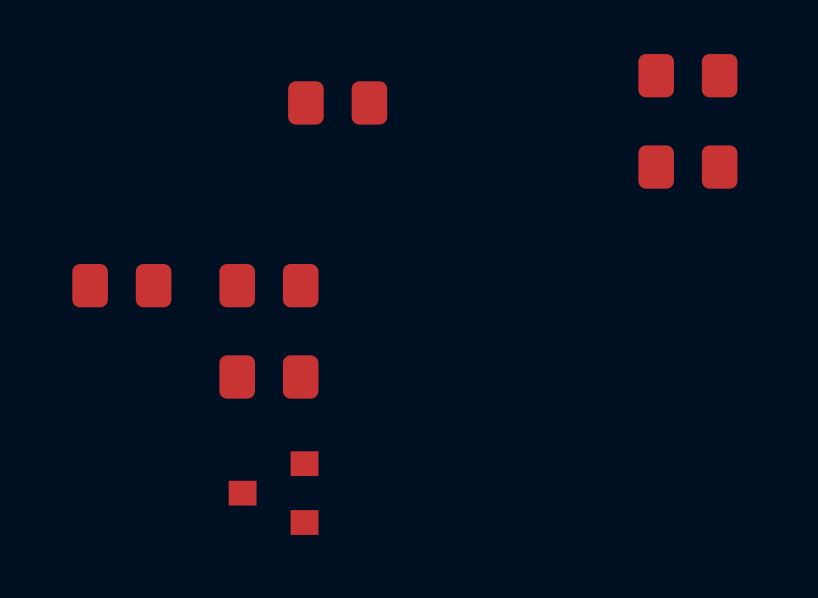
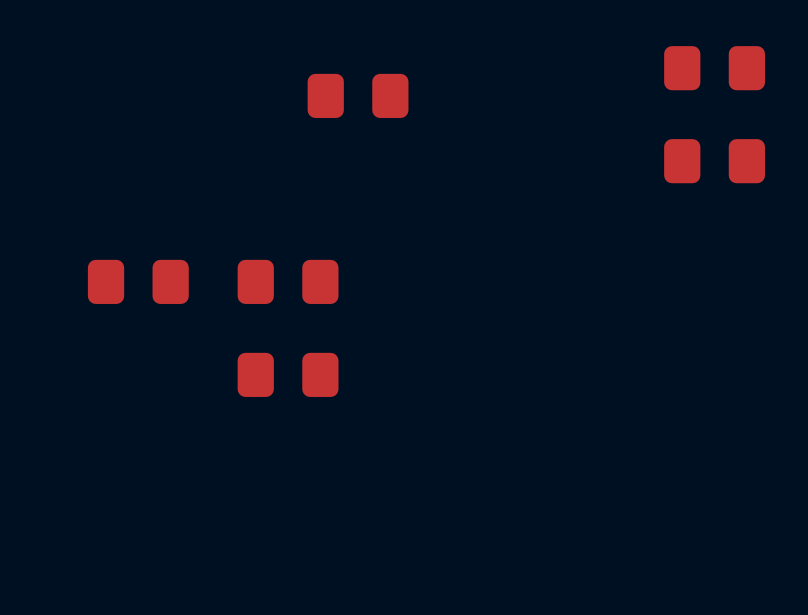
part: (273, 493) -> none

